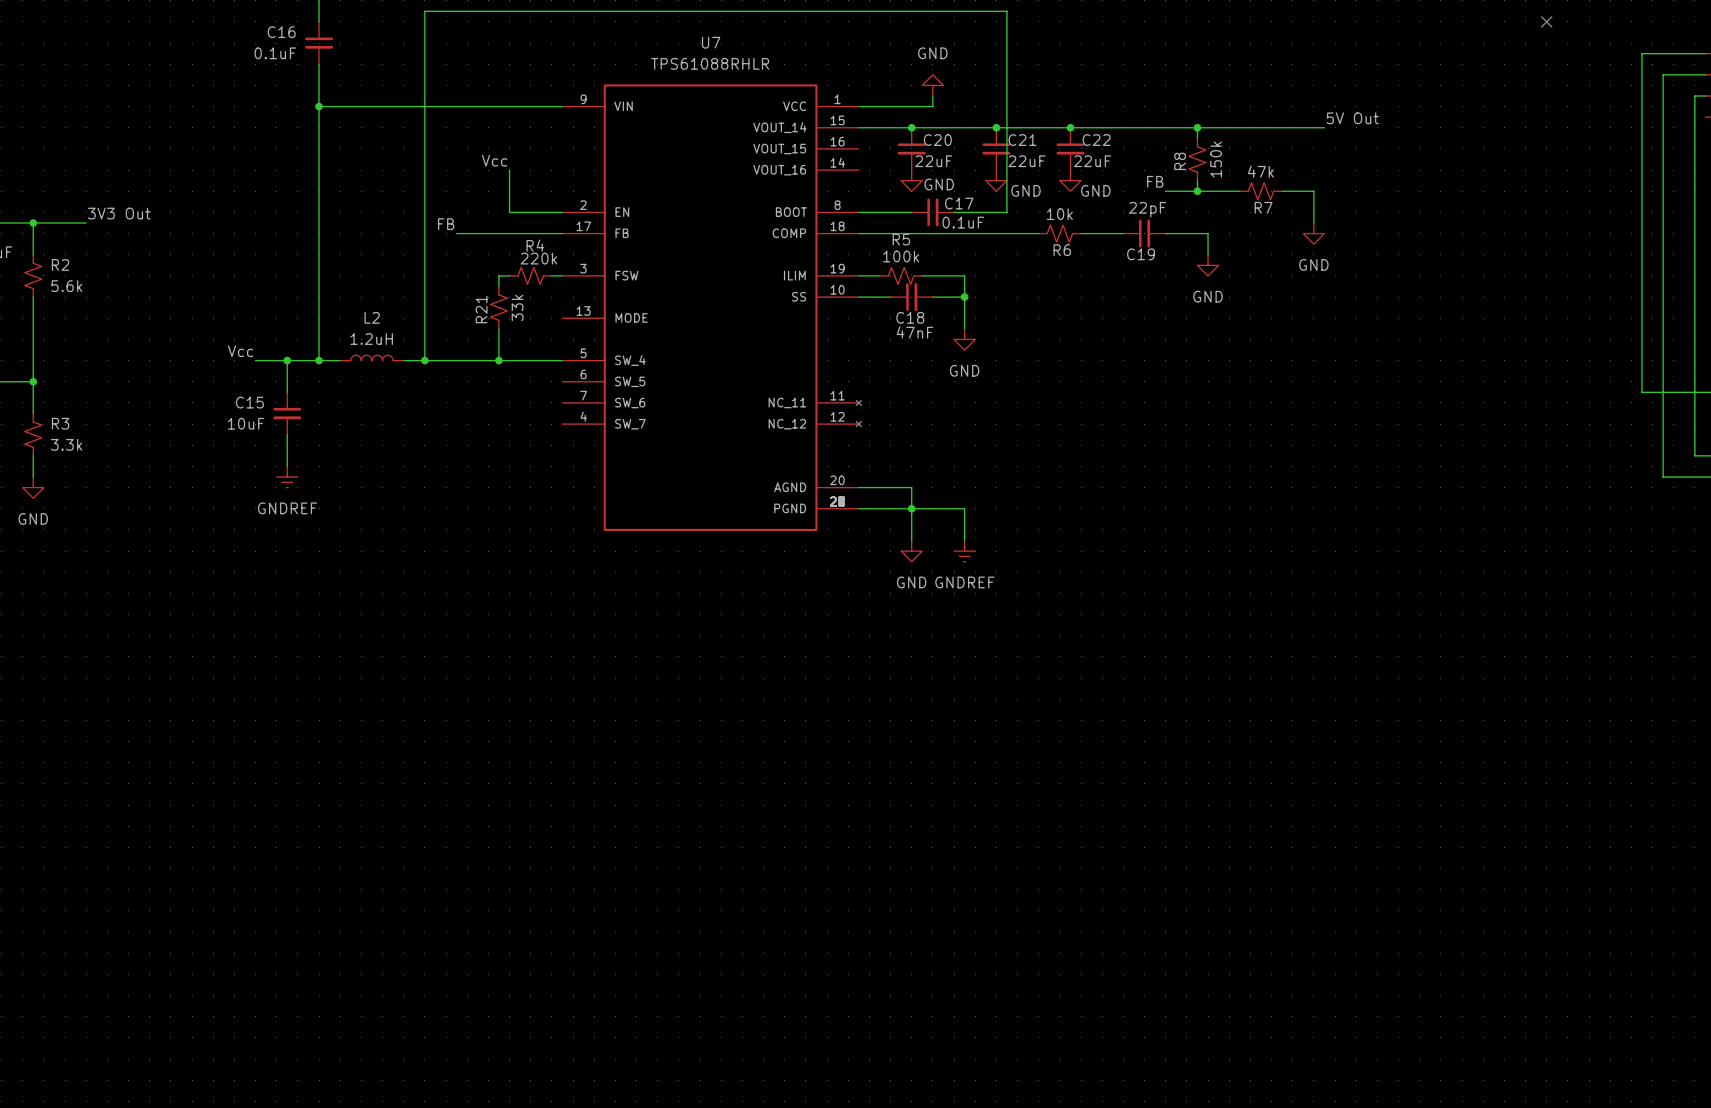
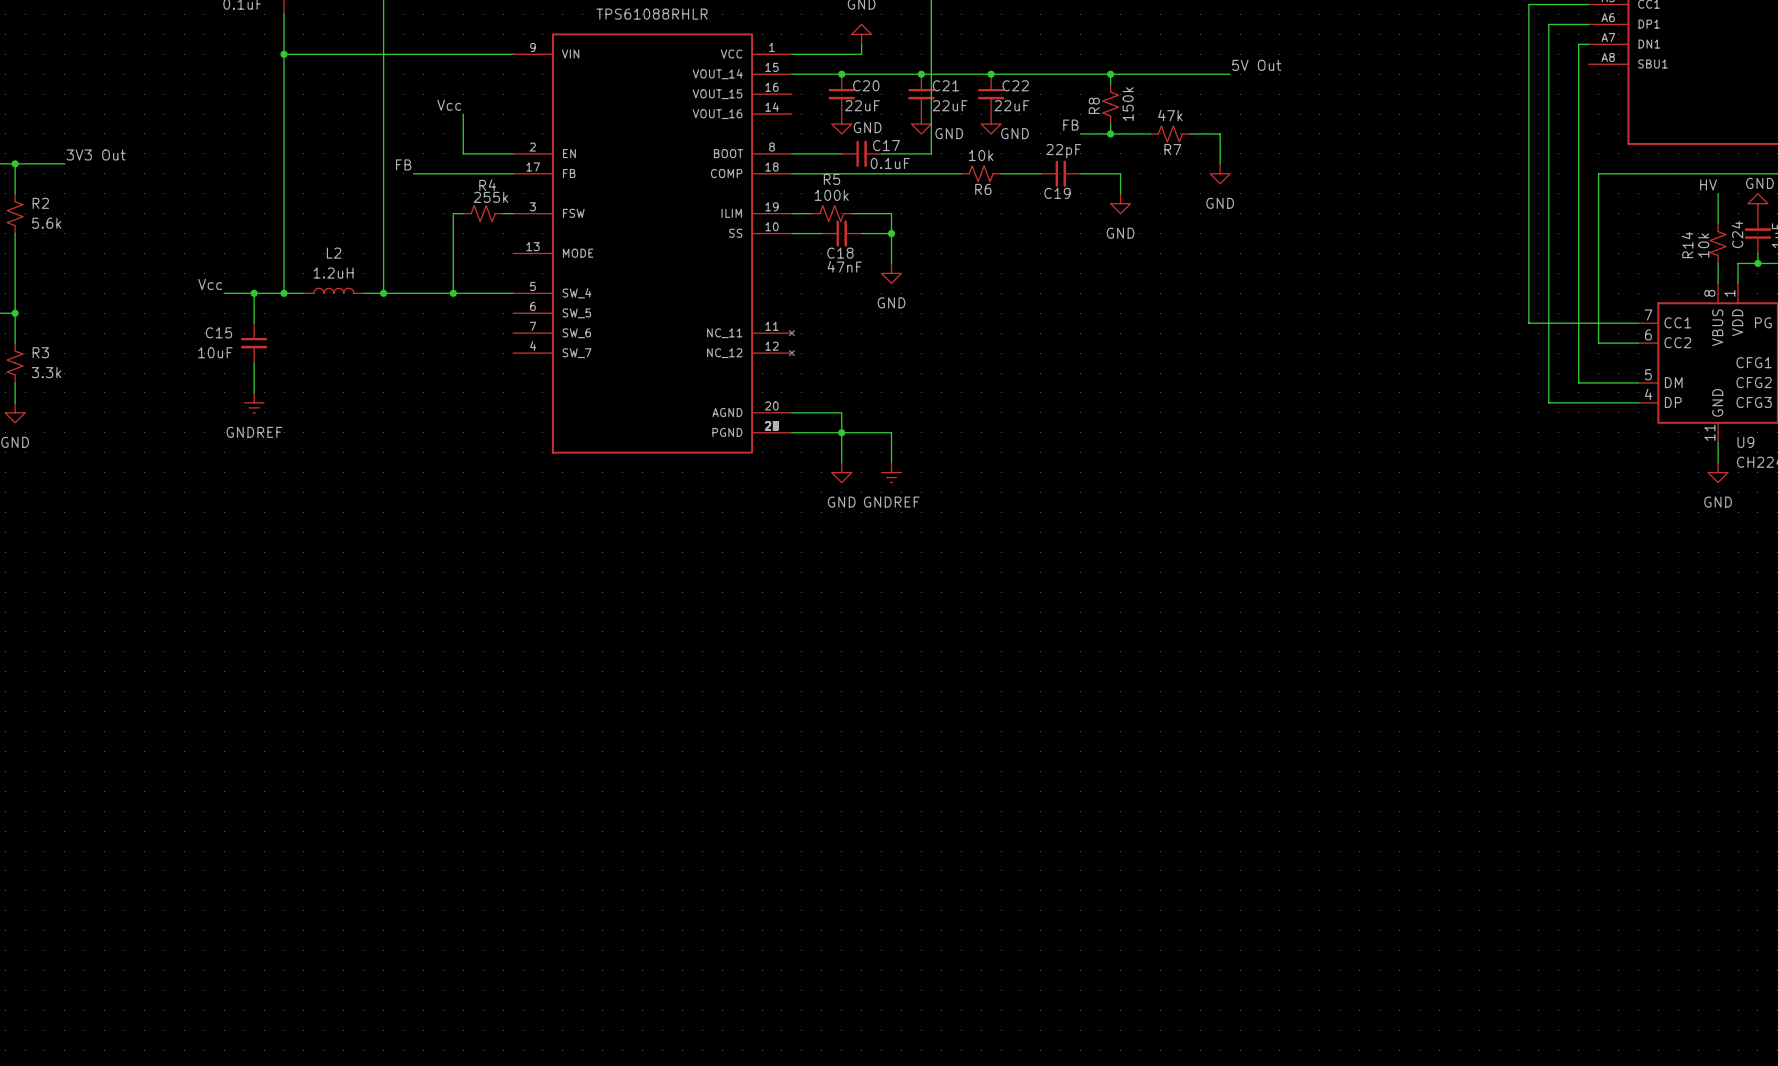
R4 value: 220k (538, 258) -> 255k (490, 197)
R21: 33k (498, 307) -> none

